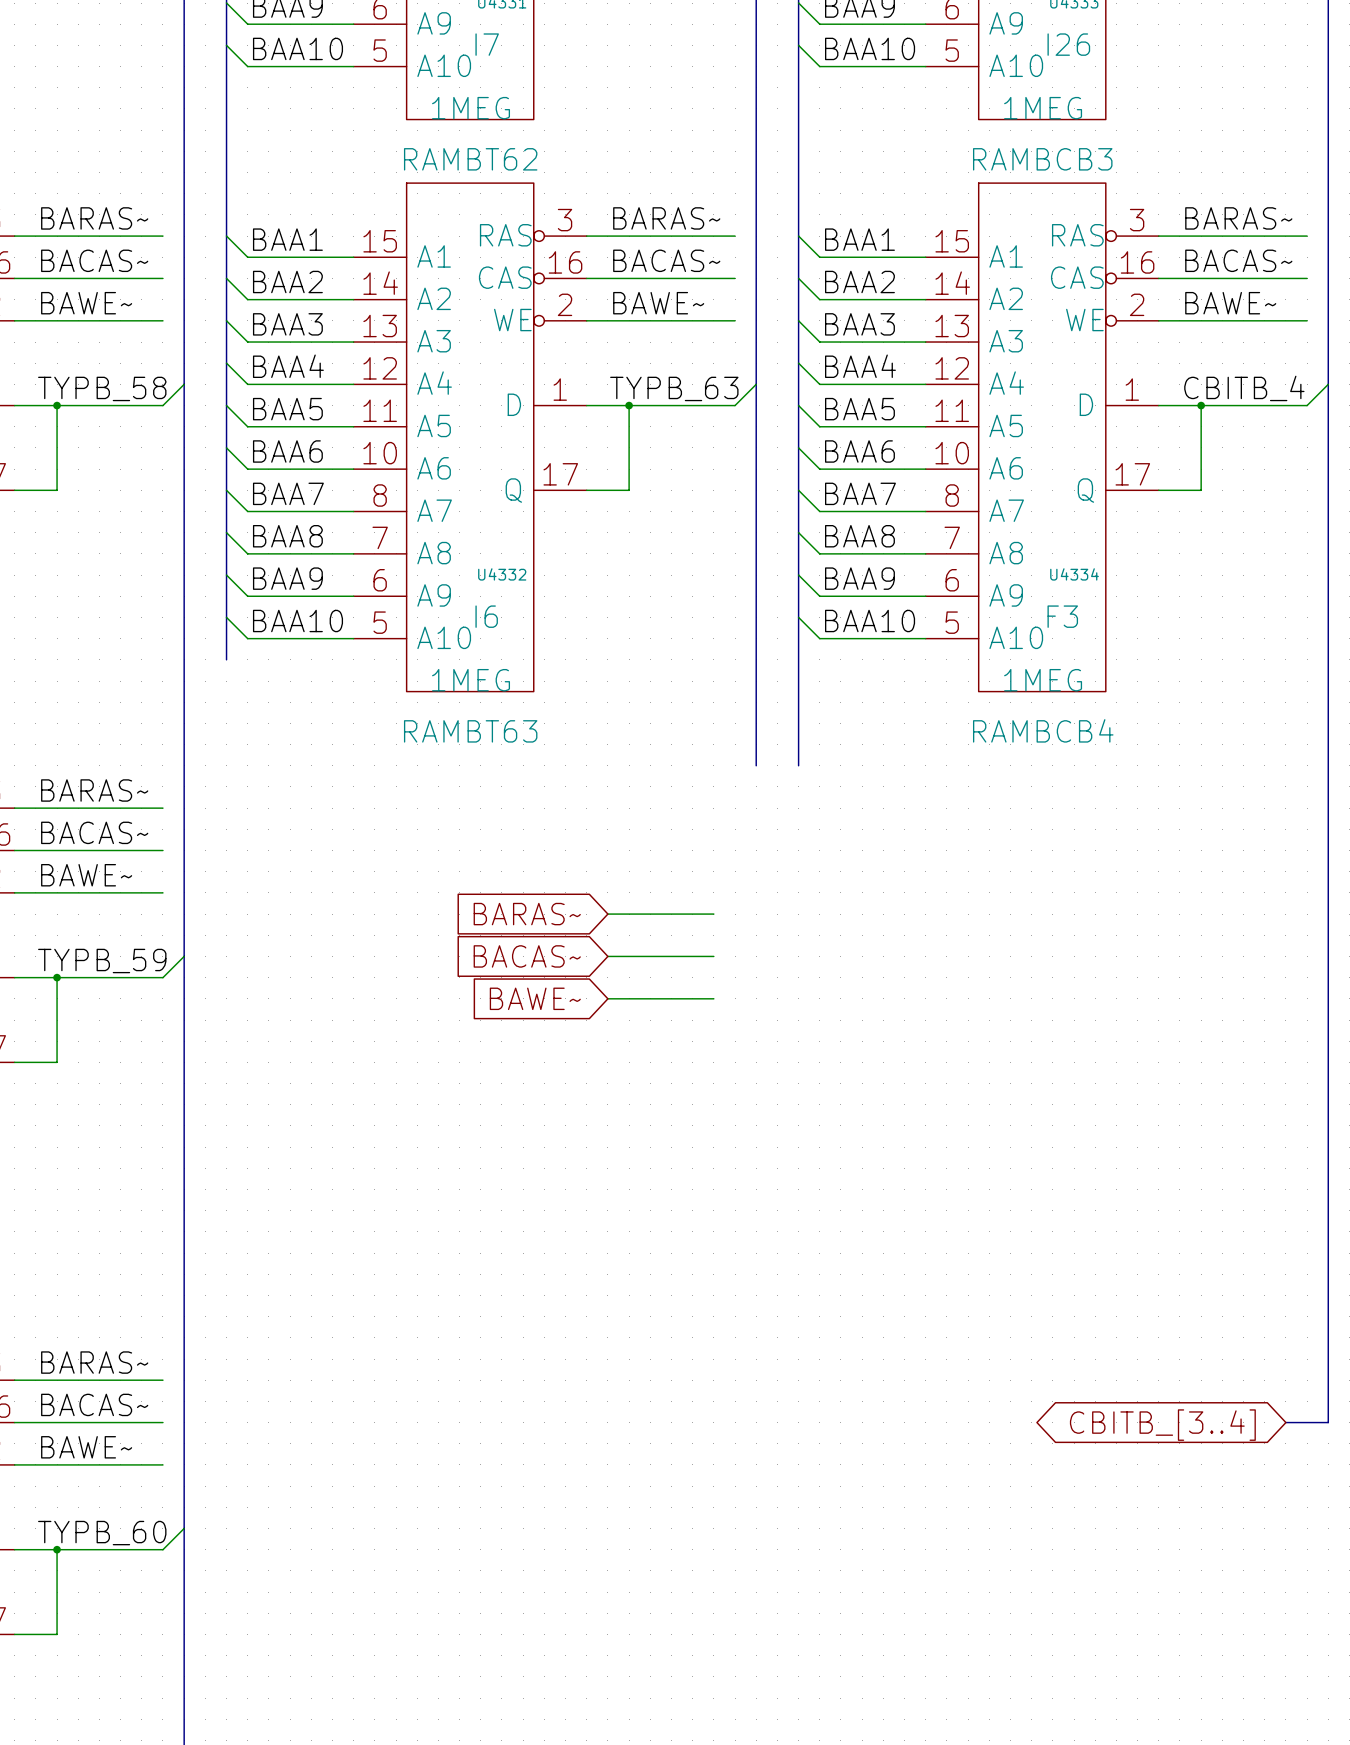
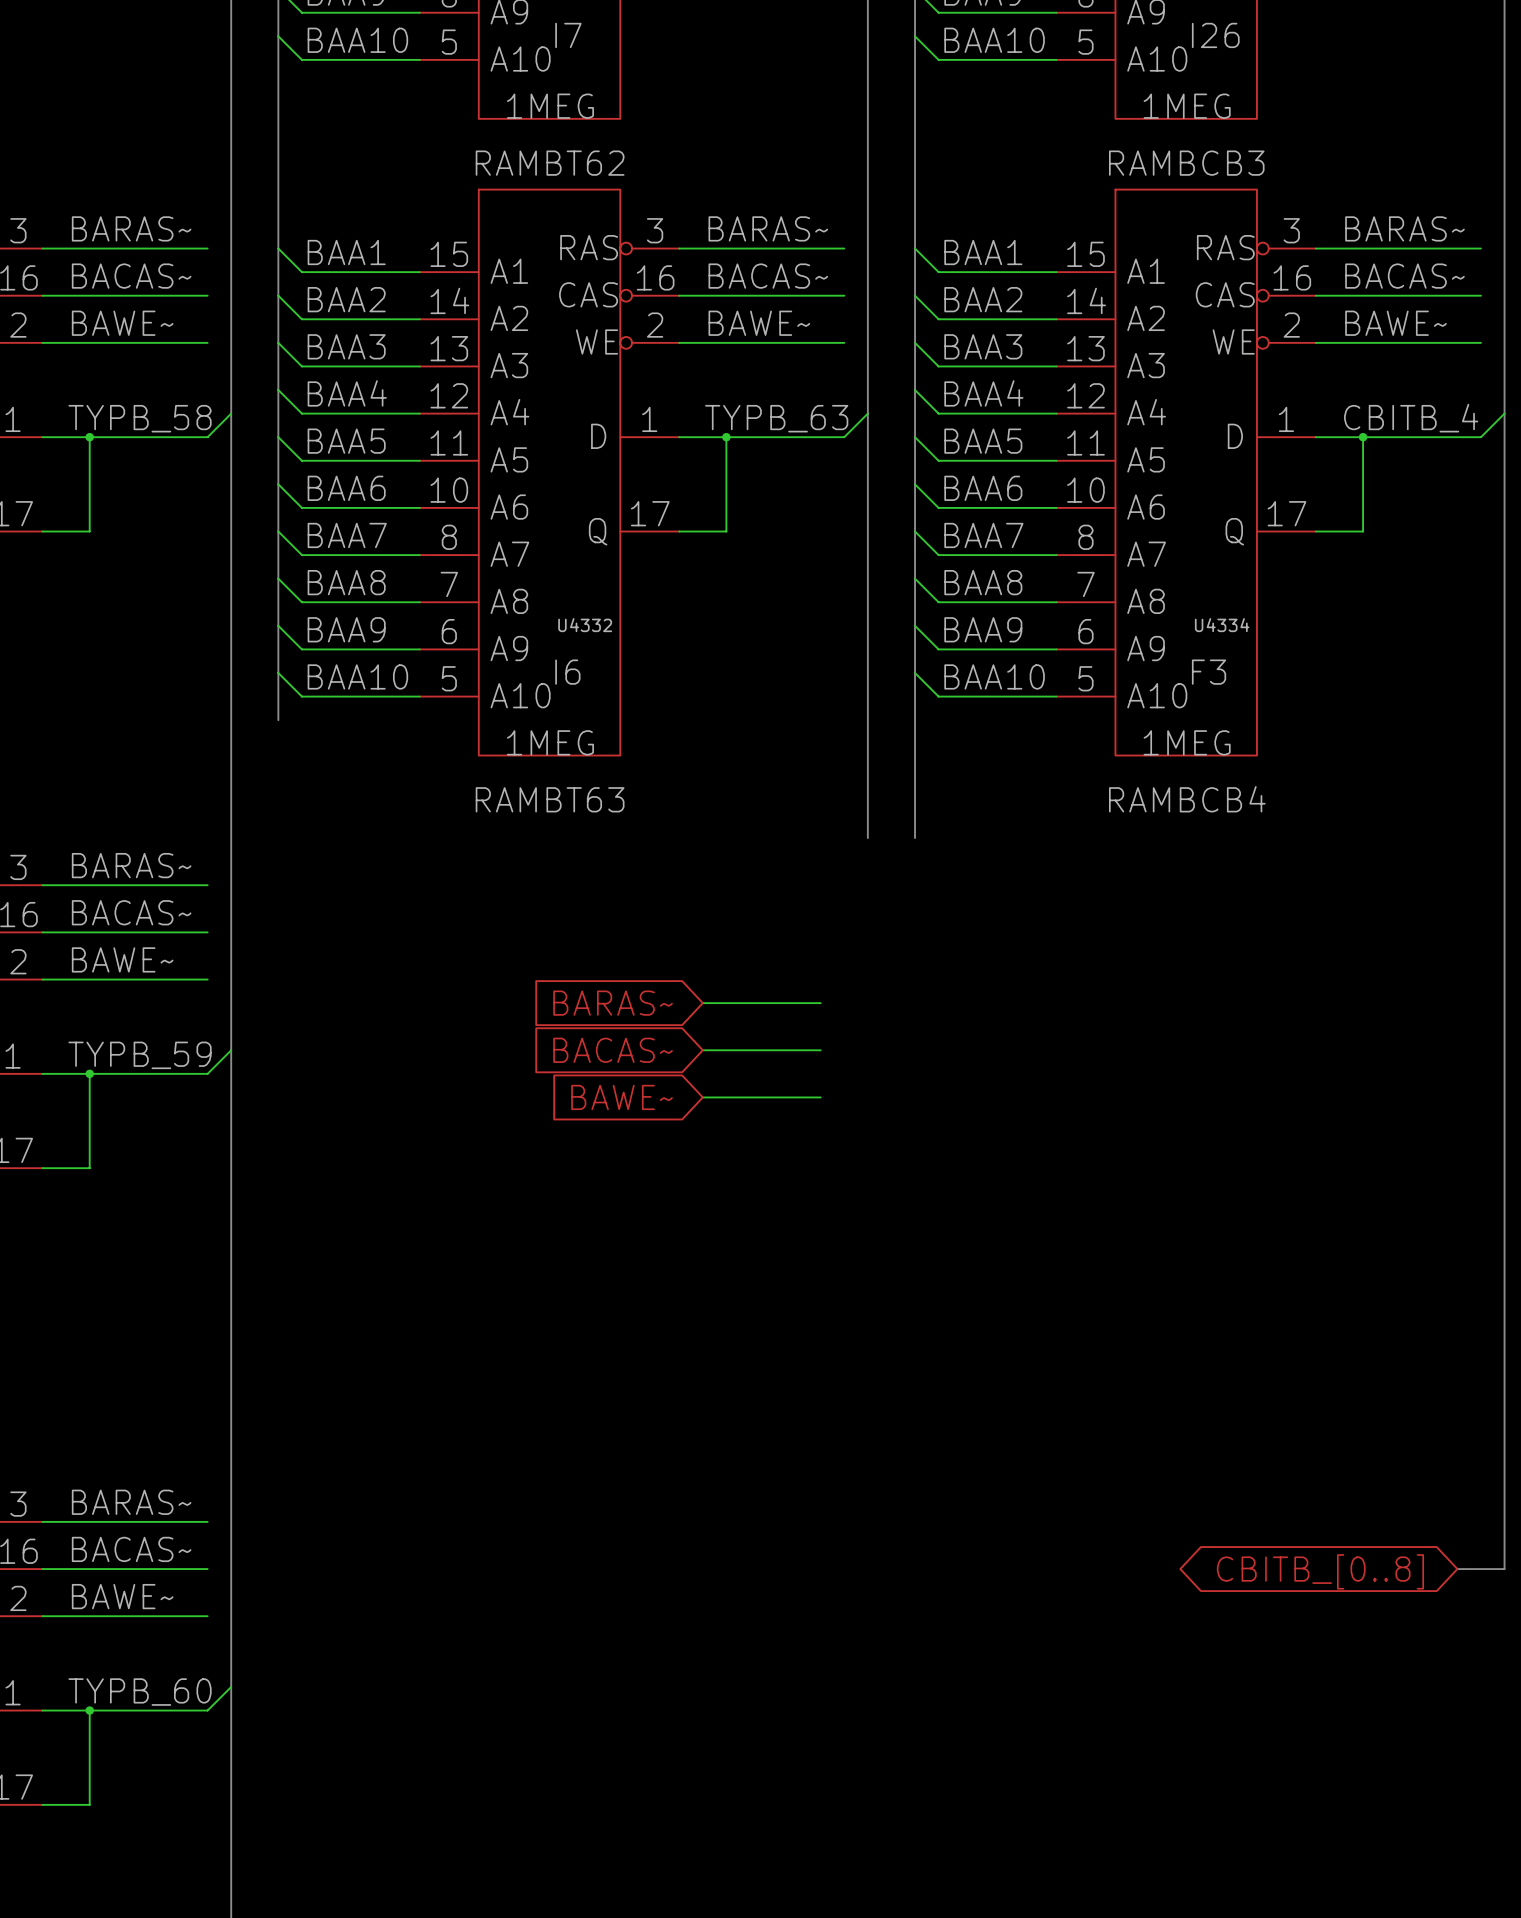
global label: CBITB_[3..4] (1162, 1425) -> CBITB_[0..8] (1320, 1571)

